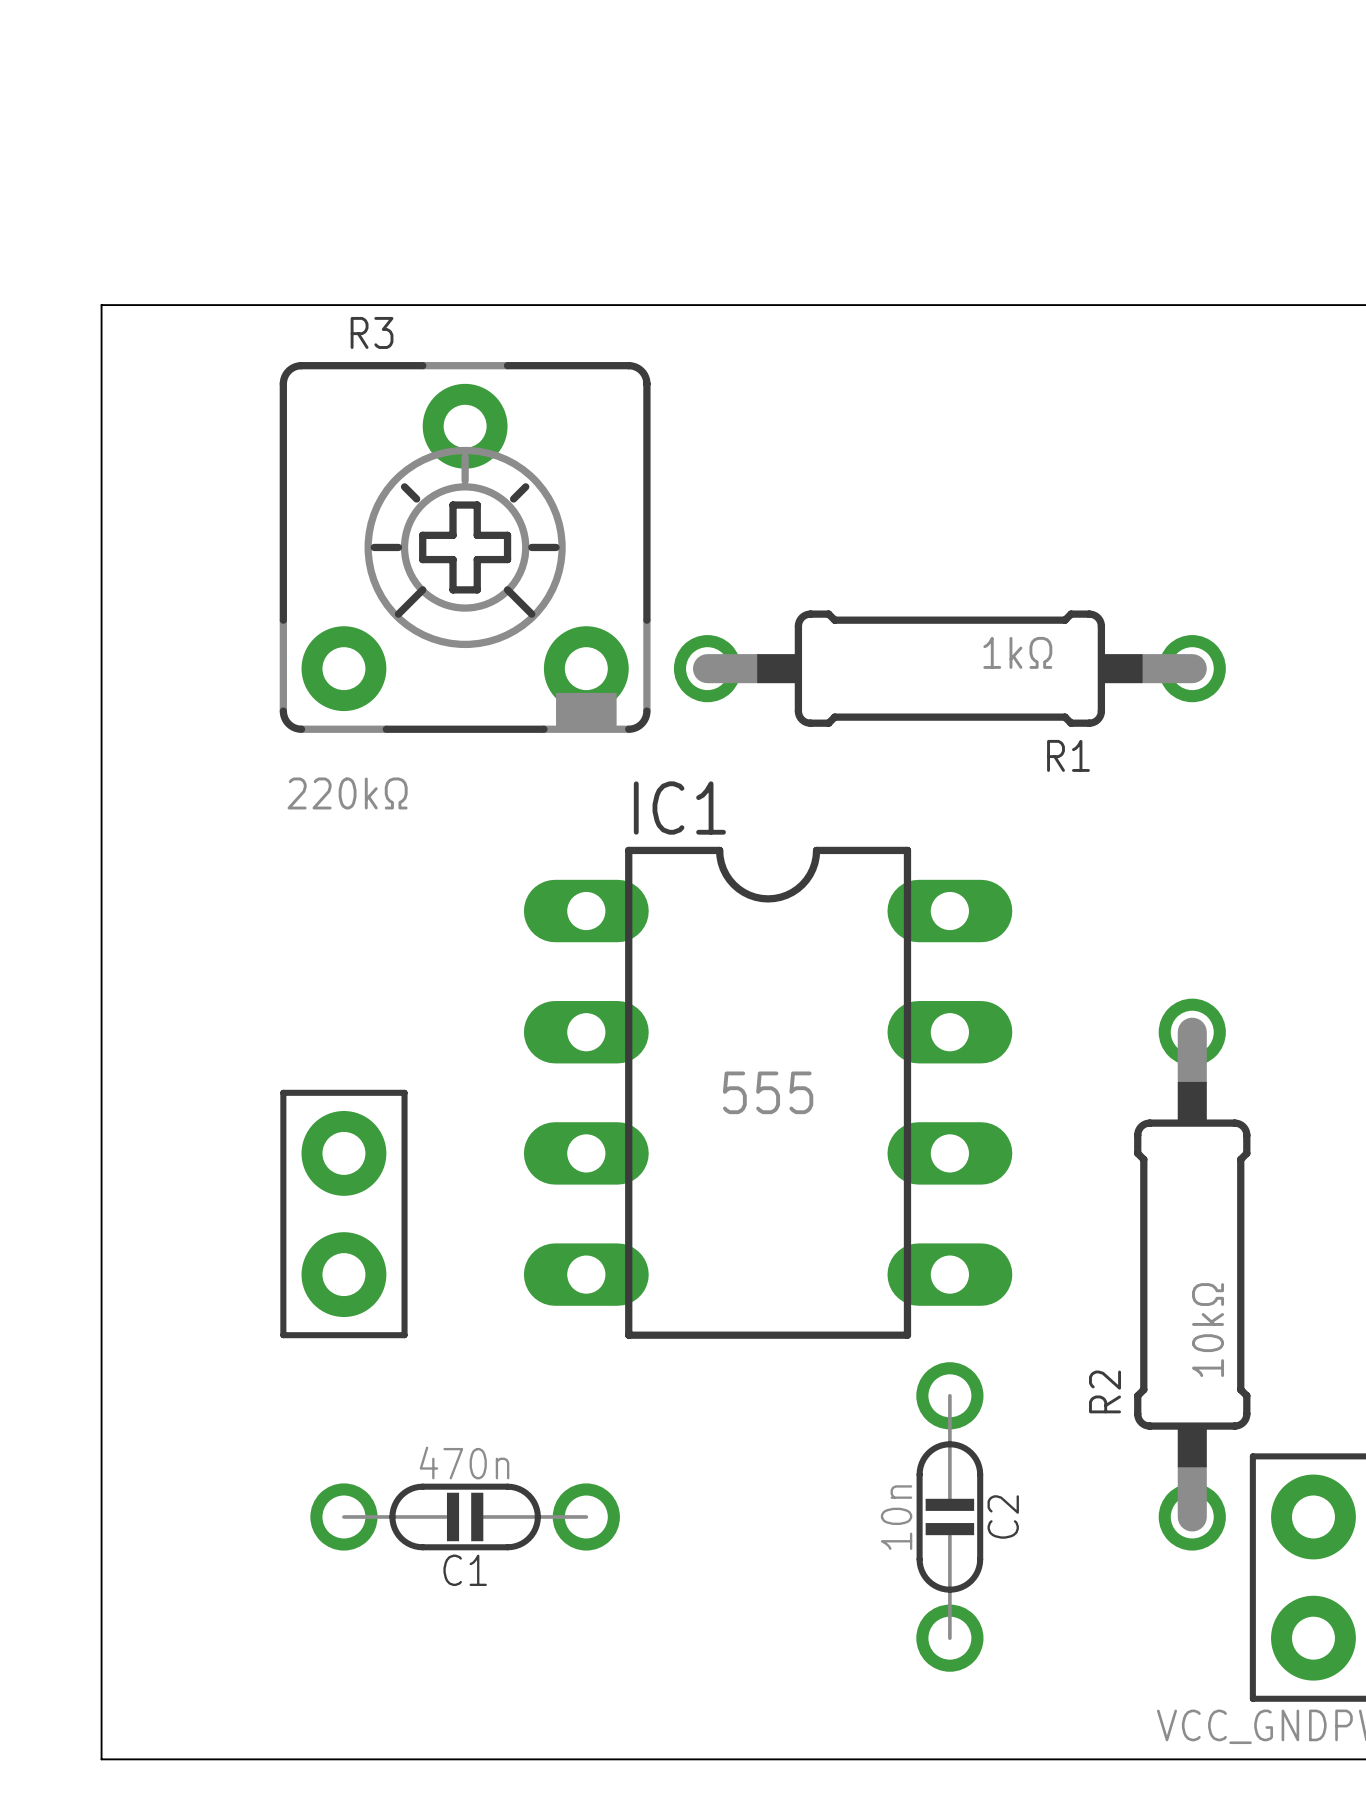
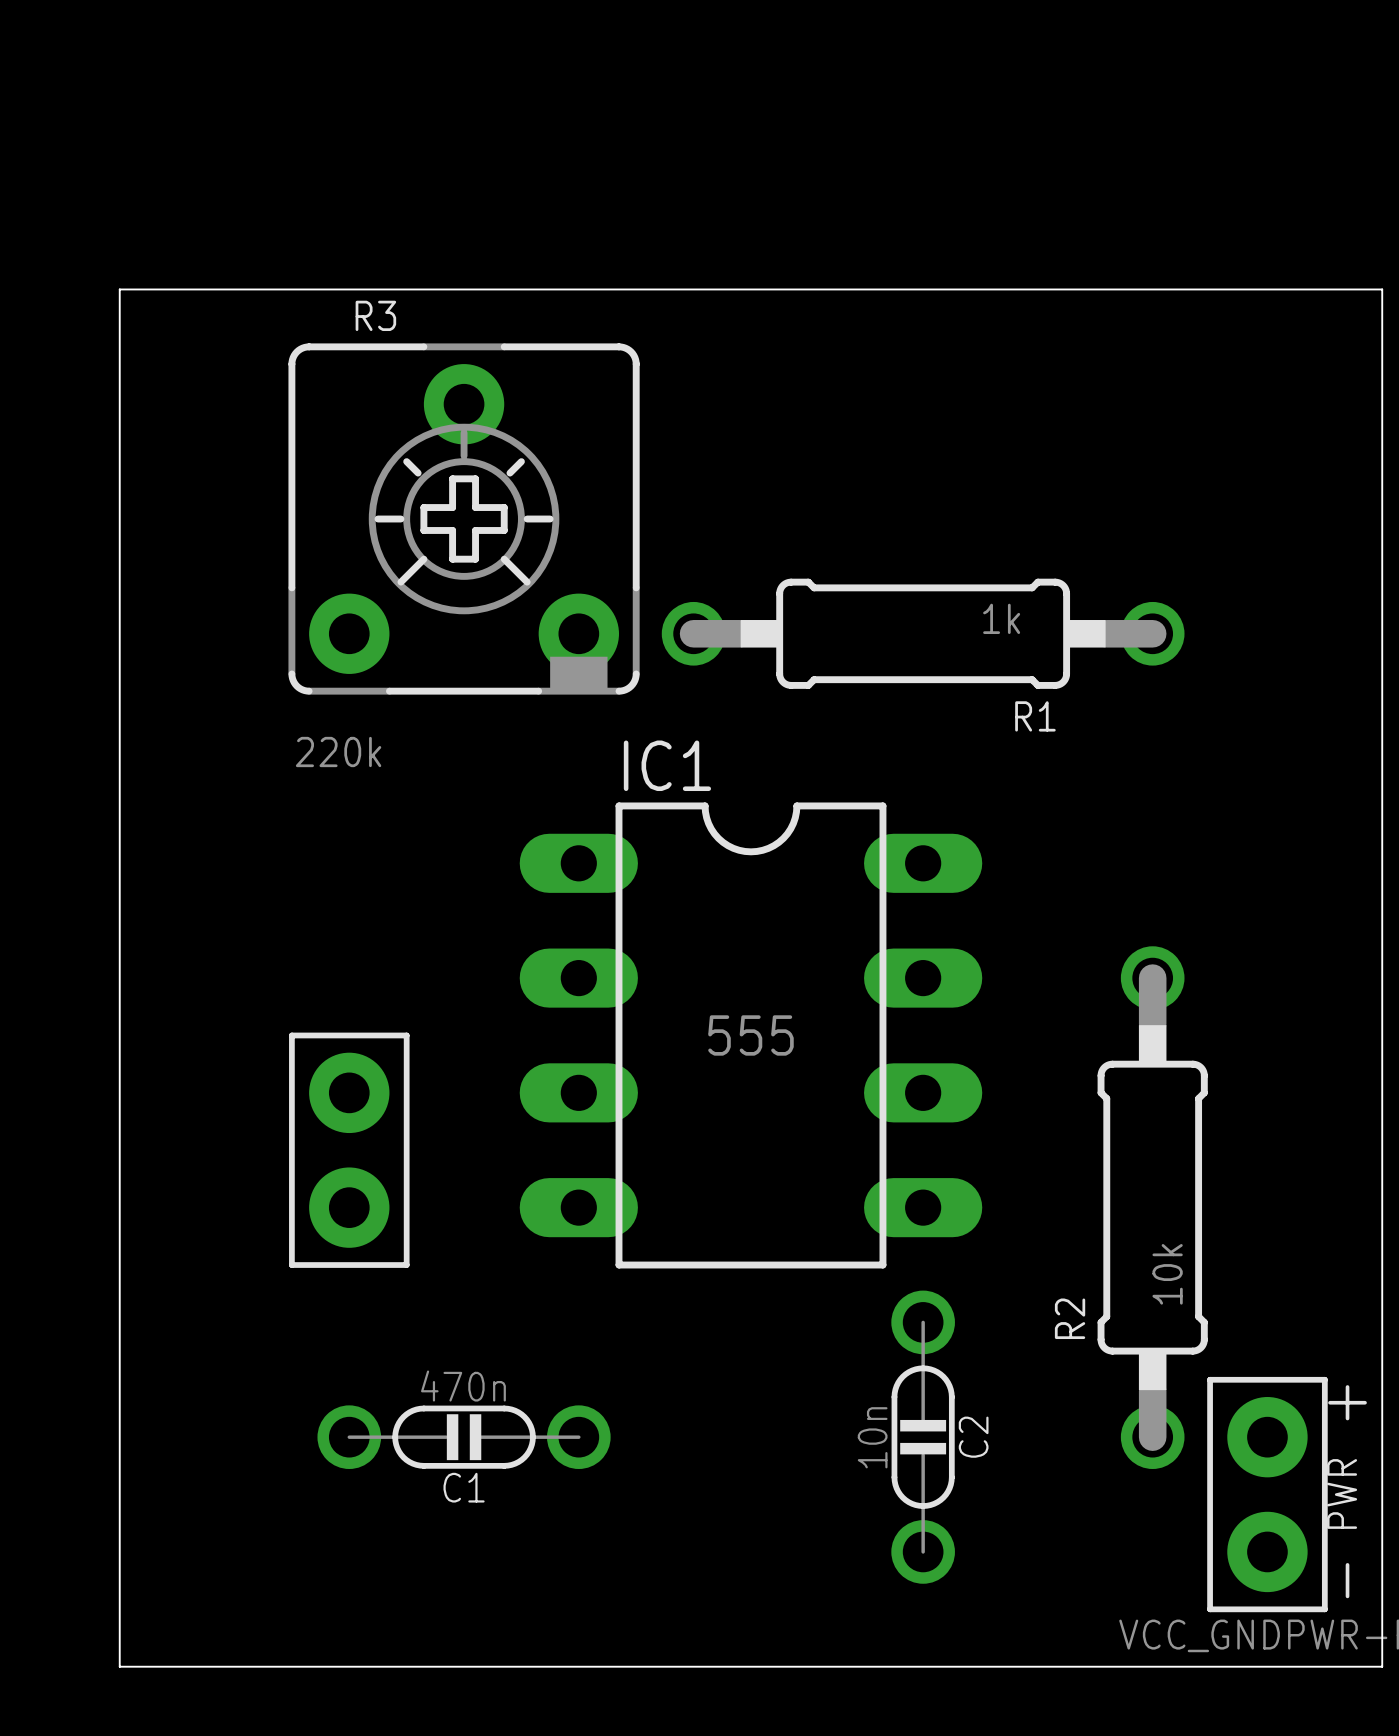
R1 value: 1kΩ (1017, 652) -> 1k (1001, 618)
R3 value: 220kΩ (347, 793) -> 220k (338, 751)
R2 value: 10kΩ (1208, 1330) -> 10k (1167, 1274)

